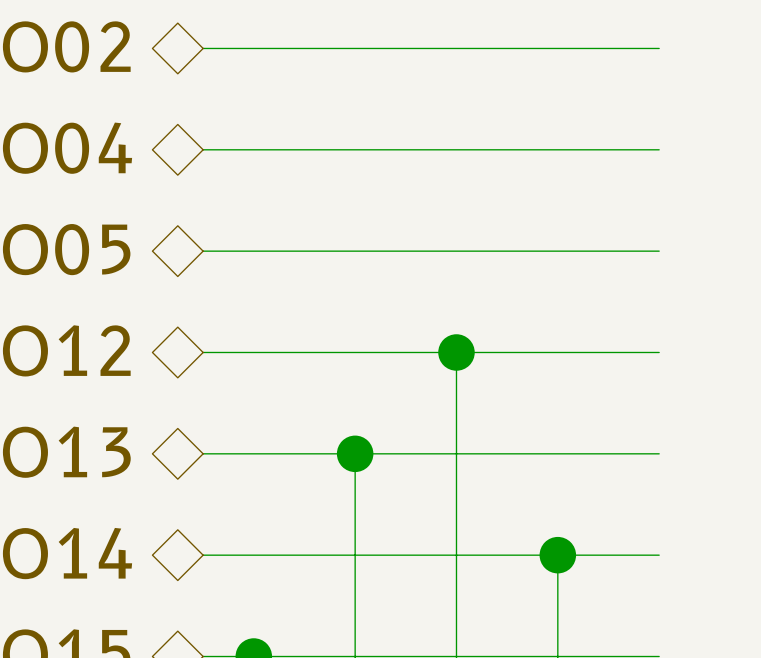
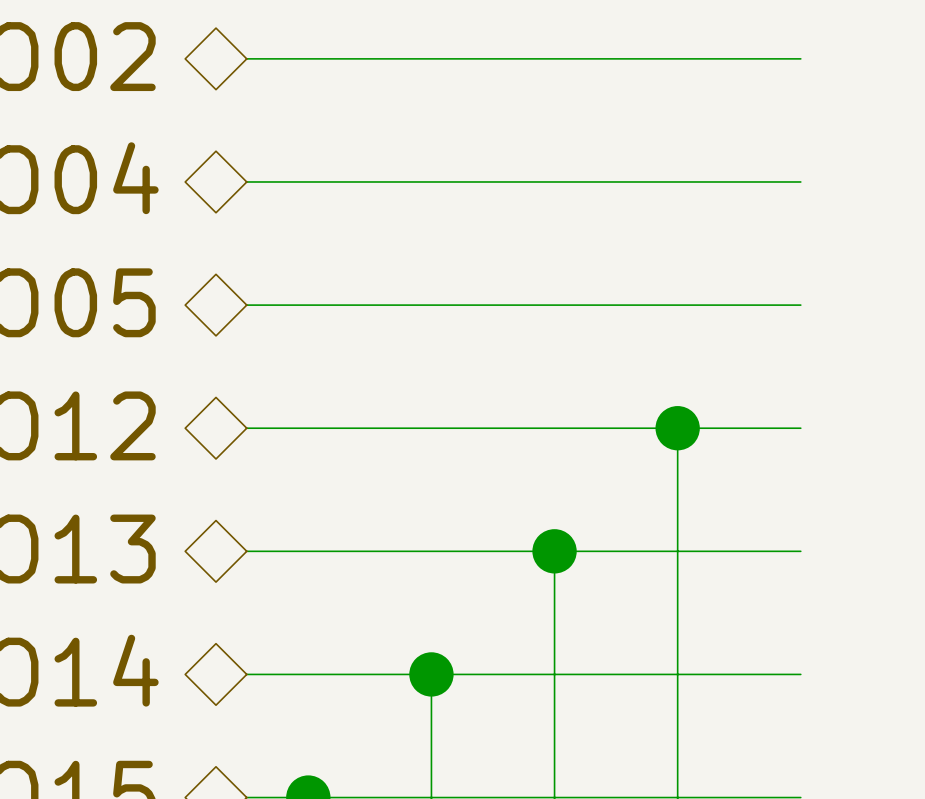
wire: (456, 352) (456, 453) -> none
junction: (456, 352) -> none
wire: none -> (677, 428) (677, 674)
junction: none -> (677, 428)
wire: (355, 453) (355, 555) -> none
junction: (355, 453) -> none
junction: none -> (554, 551)
junction: none -> (431, 674)
junction: (557, 555) -> none

